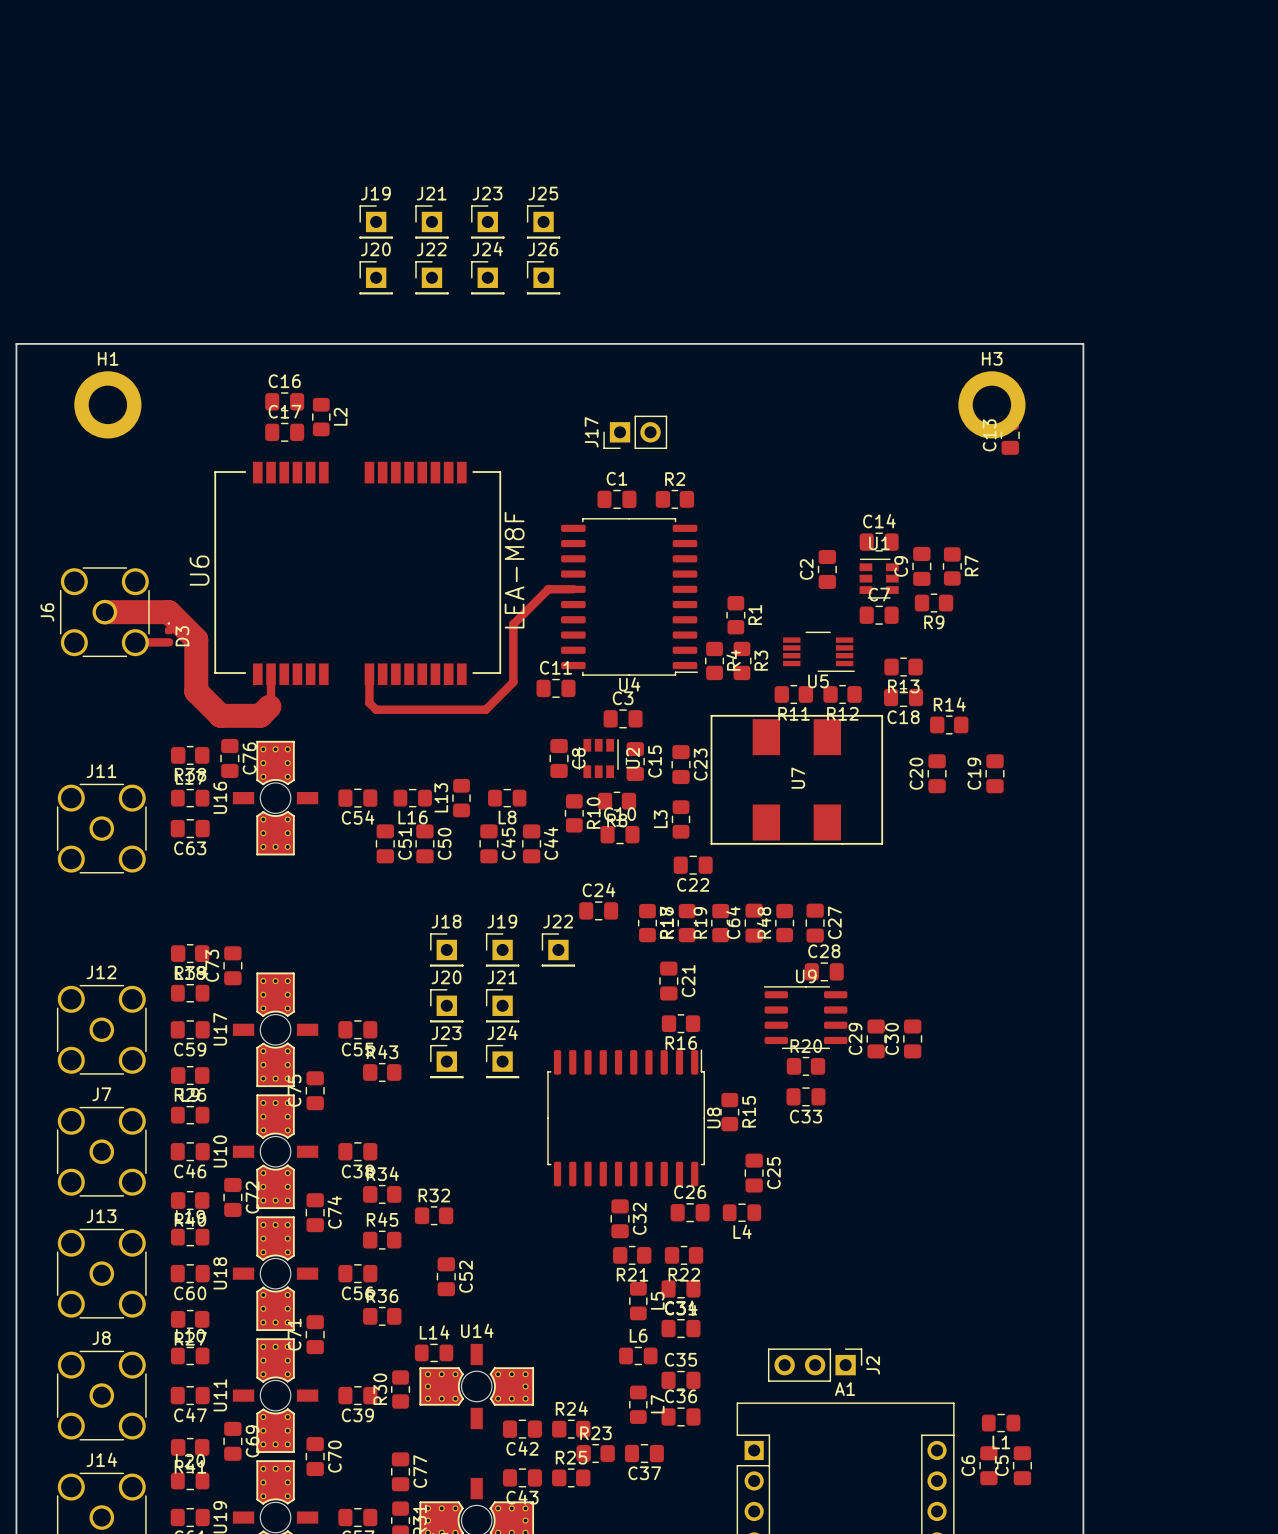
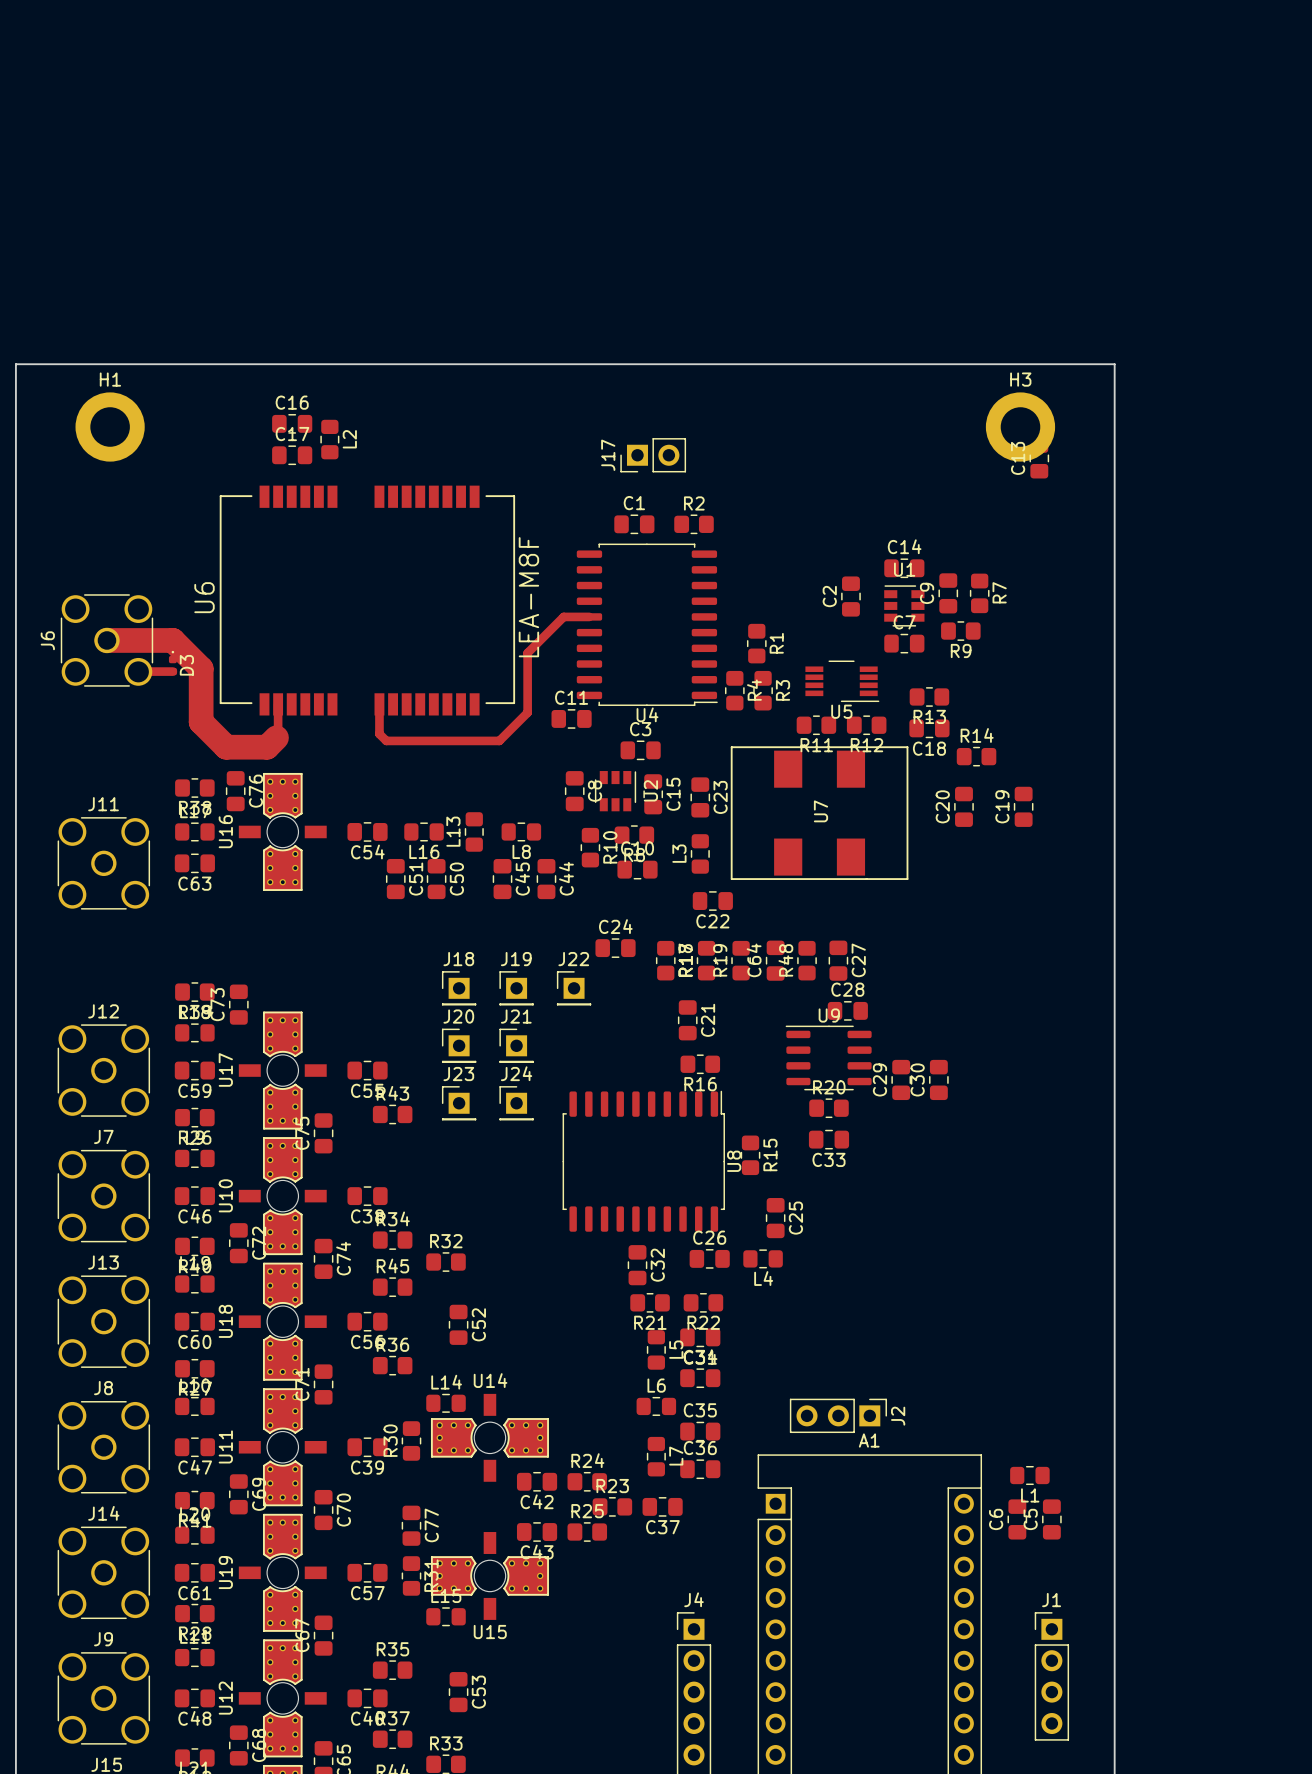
J19: (376, 221) -> none
J21: (431, 221) -> none
J23: (487, 221) -> none
J25: (543, 221) -> none
J20: (376, 277) -> none
J22: (431, 277) -> none
J24: (487, 277) -> none
J26: (543, 277) -> none

